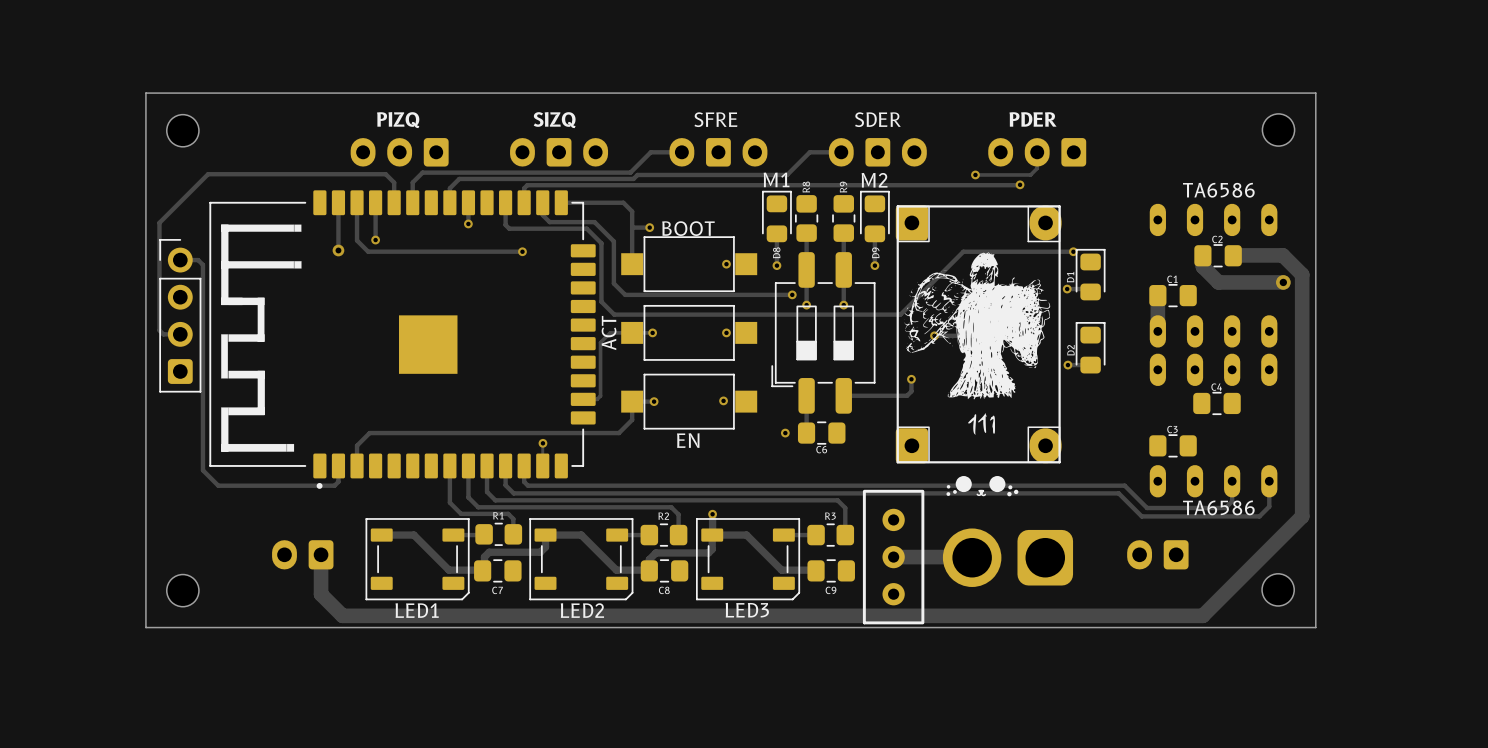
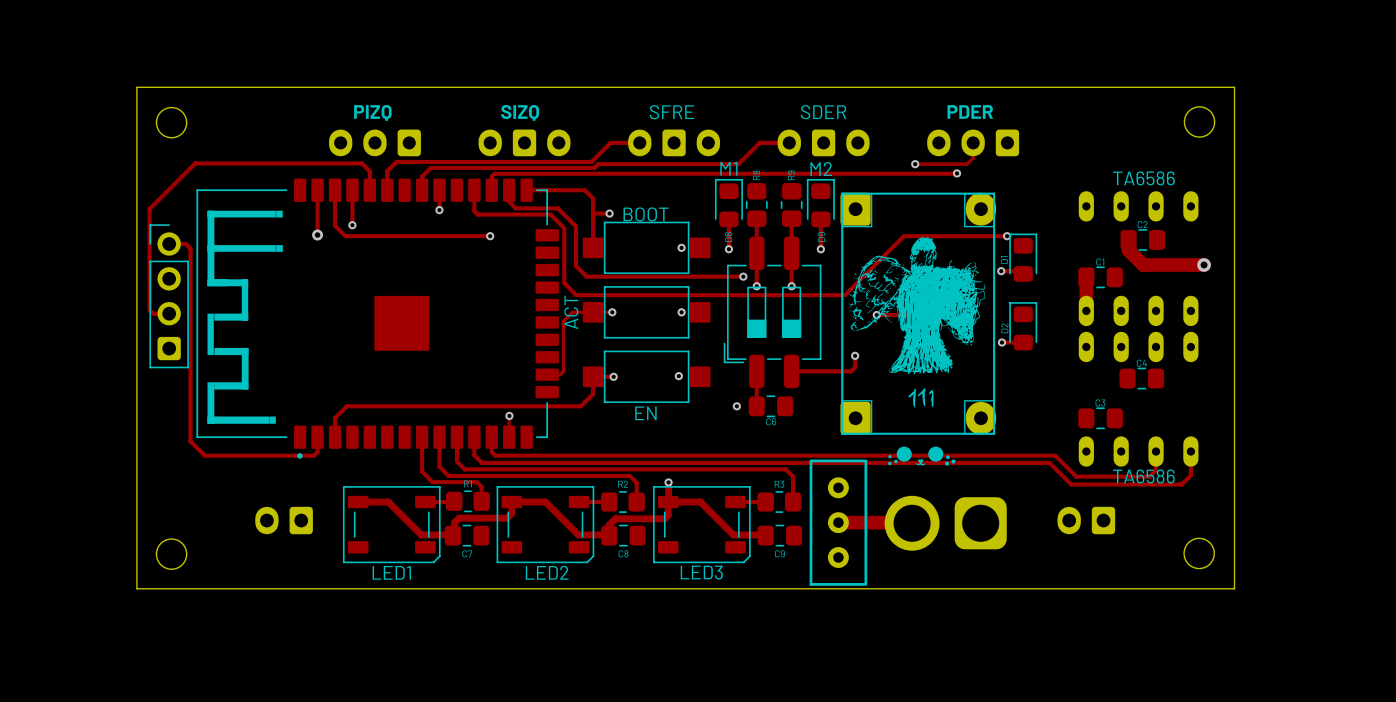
track: (1233, 255) (1282, 255) (1302, 274) (1302, 516) (1202, 615) (342, 615) (321, 594) (321, 554) -> none

